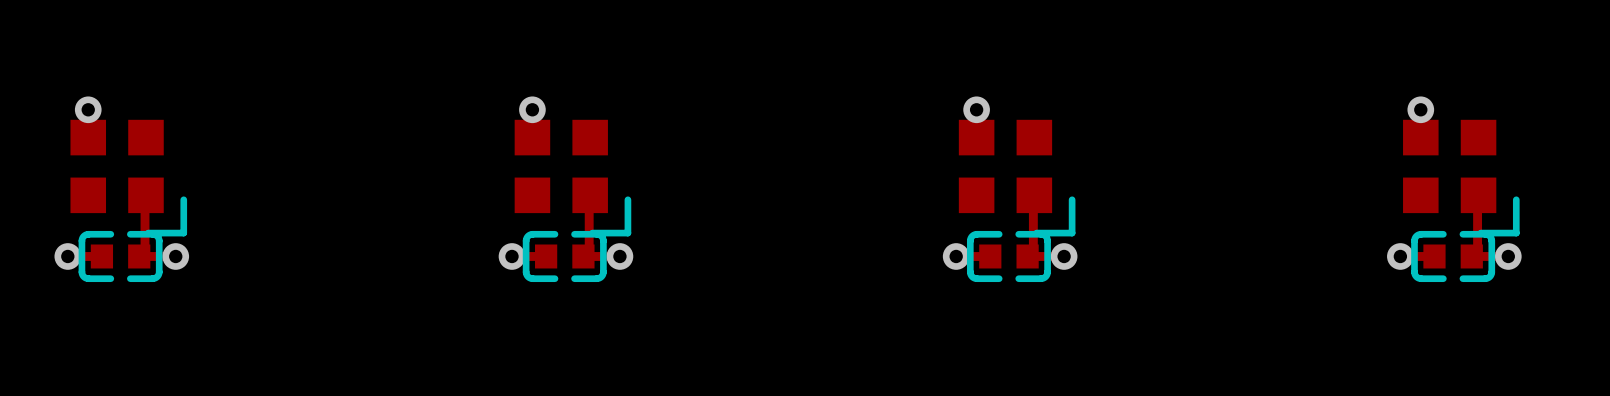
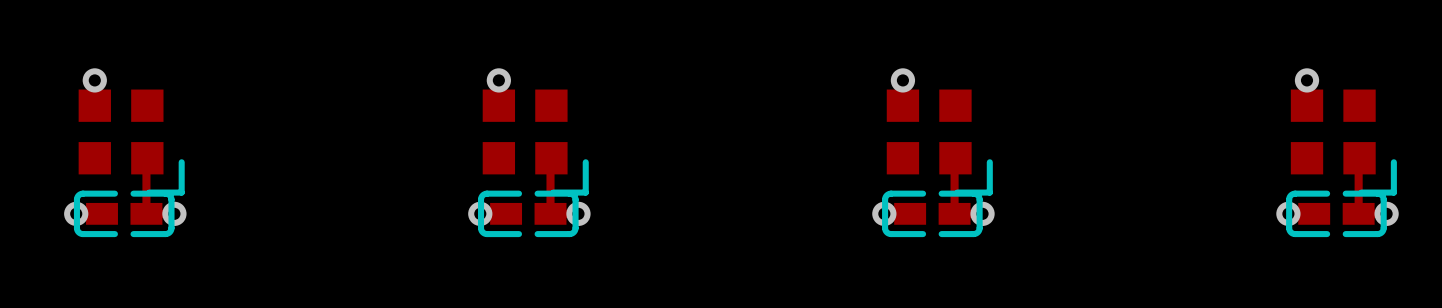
part footprint: [78, 230, 163, 283] -> [73, 190, 175, 238]
part footprint: [522, 230, 607, 283] -> [477, 190, 579, 238]
part footprint: [966, 230, 1051, 283] -> [882, 190, 983, 238]
part footprint: [1411, 230, 1496, 283] -> [1286, 190, 1387, 238]

